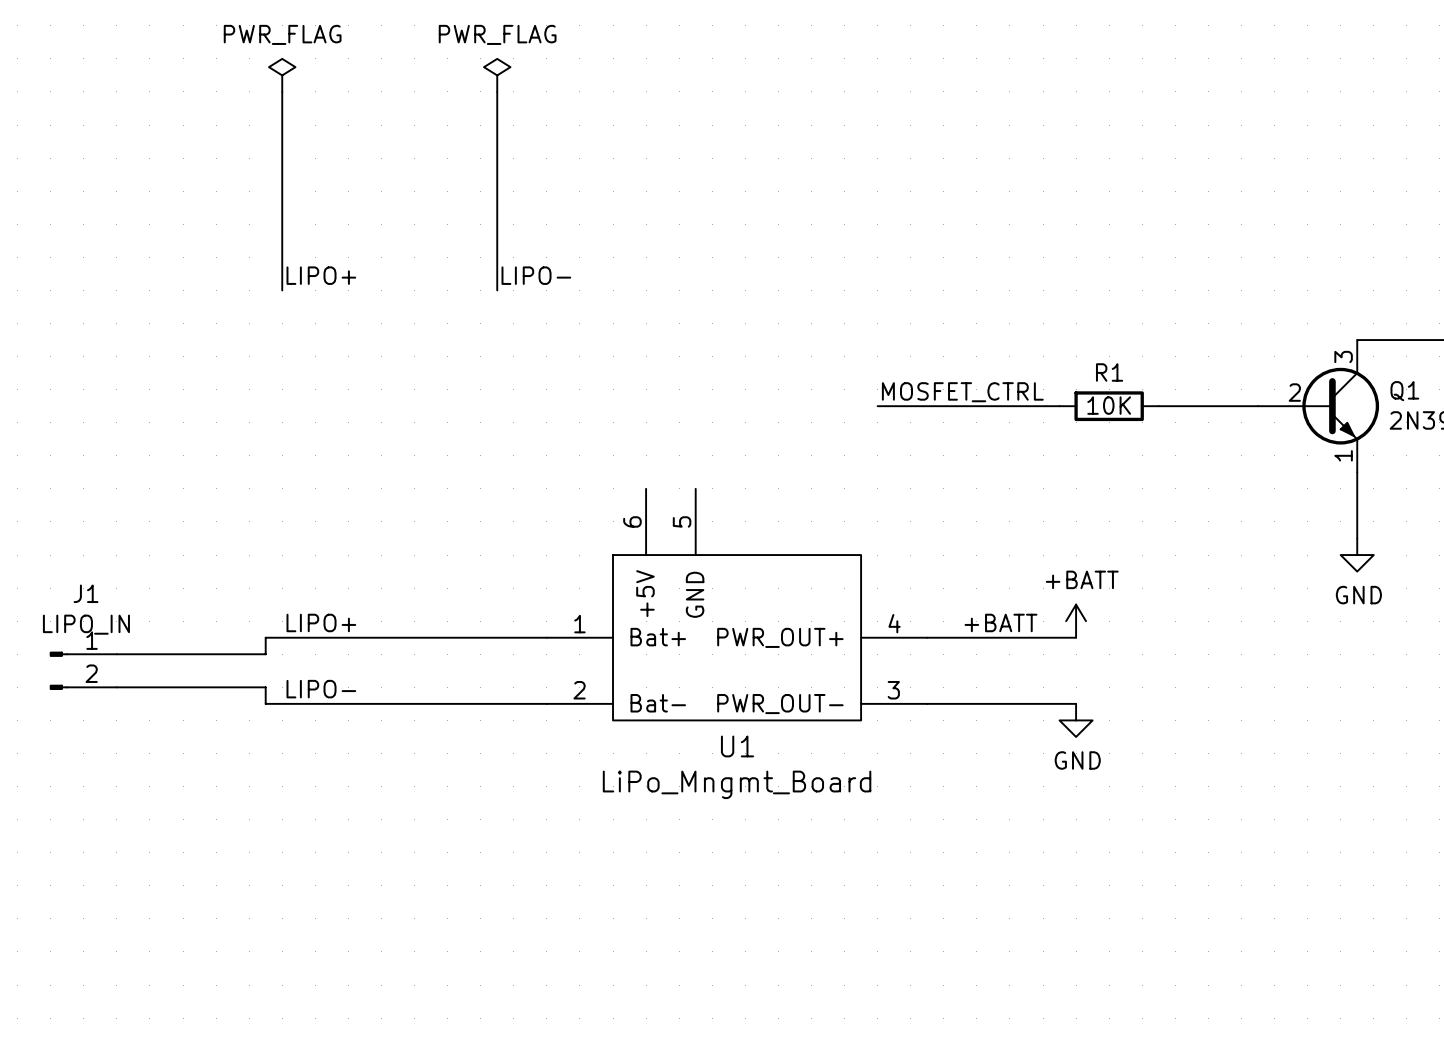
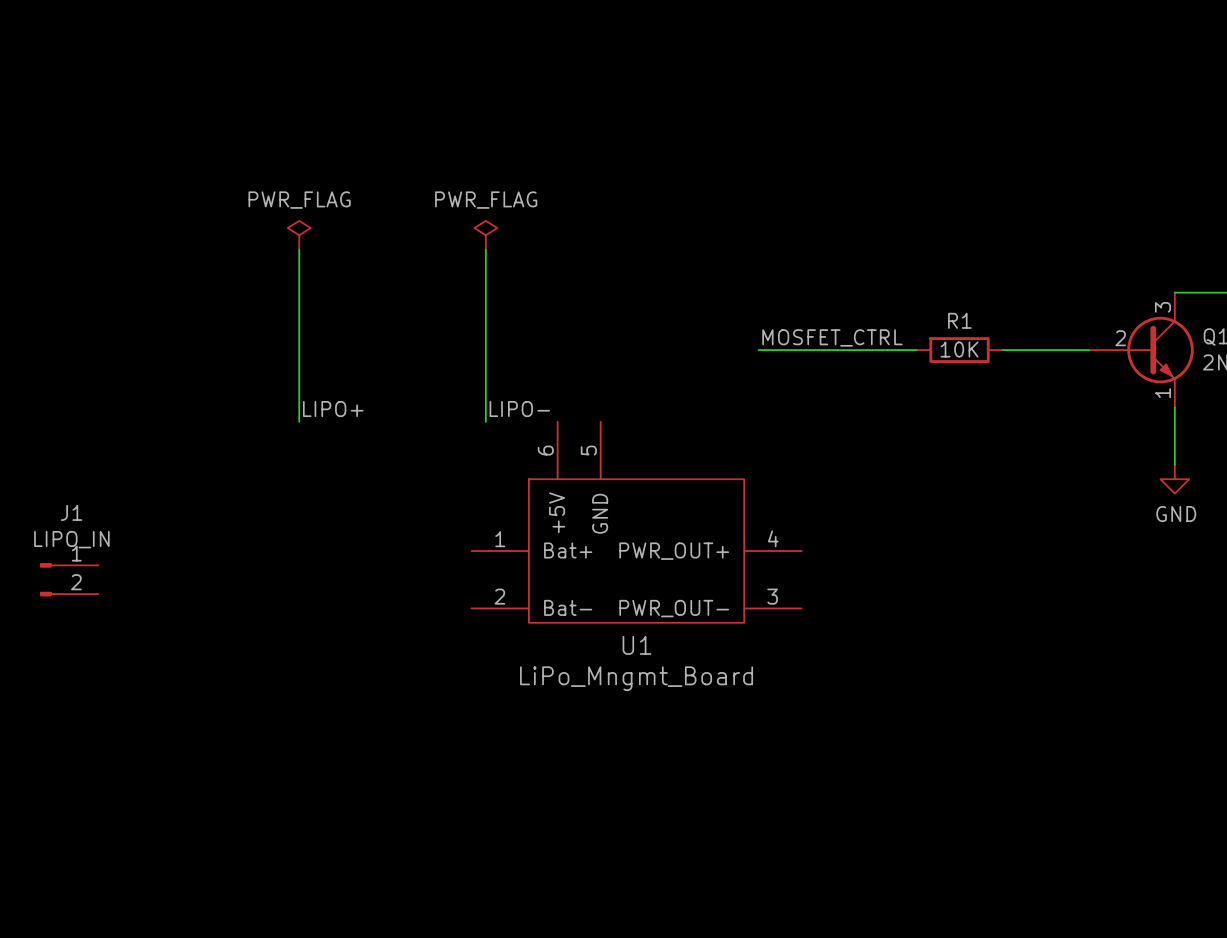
power symbol: PWR_FLAG (282, 75) -> none
power symbol: PWR_FLAG (497, 75) -> none
wire: (282, 91) (282, 290) -> (299, 249) (299, 421)
wire: (497, 91) (497, 290) -> (485, 249) (485, 421)
power symbol: none -> PWR_FLAG (299, 235)
power symbol: none -> PWR_FLAG (485, 235)
label: LIPO+ (321, 275) -> none
label: LIPO- (536, 275) -> none
label: none -> LIPO+ (333, 409)
label: none -> LIPO- (519, 409)
power symbol: +BATT (1076, 621) -> none
label: LIPO+ (321, 622) -> none
label: +BATT (1001, 622) -> none
wire: (546, 637) (265, 637) (265, 654) (116, 654) -> none
wire: (927, 637) (1076, 637) -> none
wire: (116, 687) (265, 687) (265, 703) (546, 703) -> none
label: LIPO- (321, 689) -> none
wire: (927, 703) (1076, 703) -> none
power symbol: GND (1076, 720) -> none

